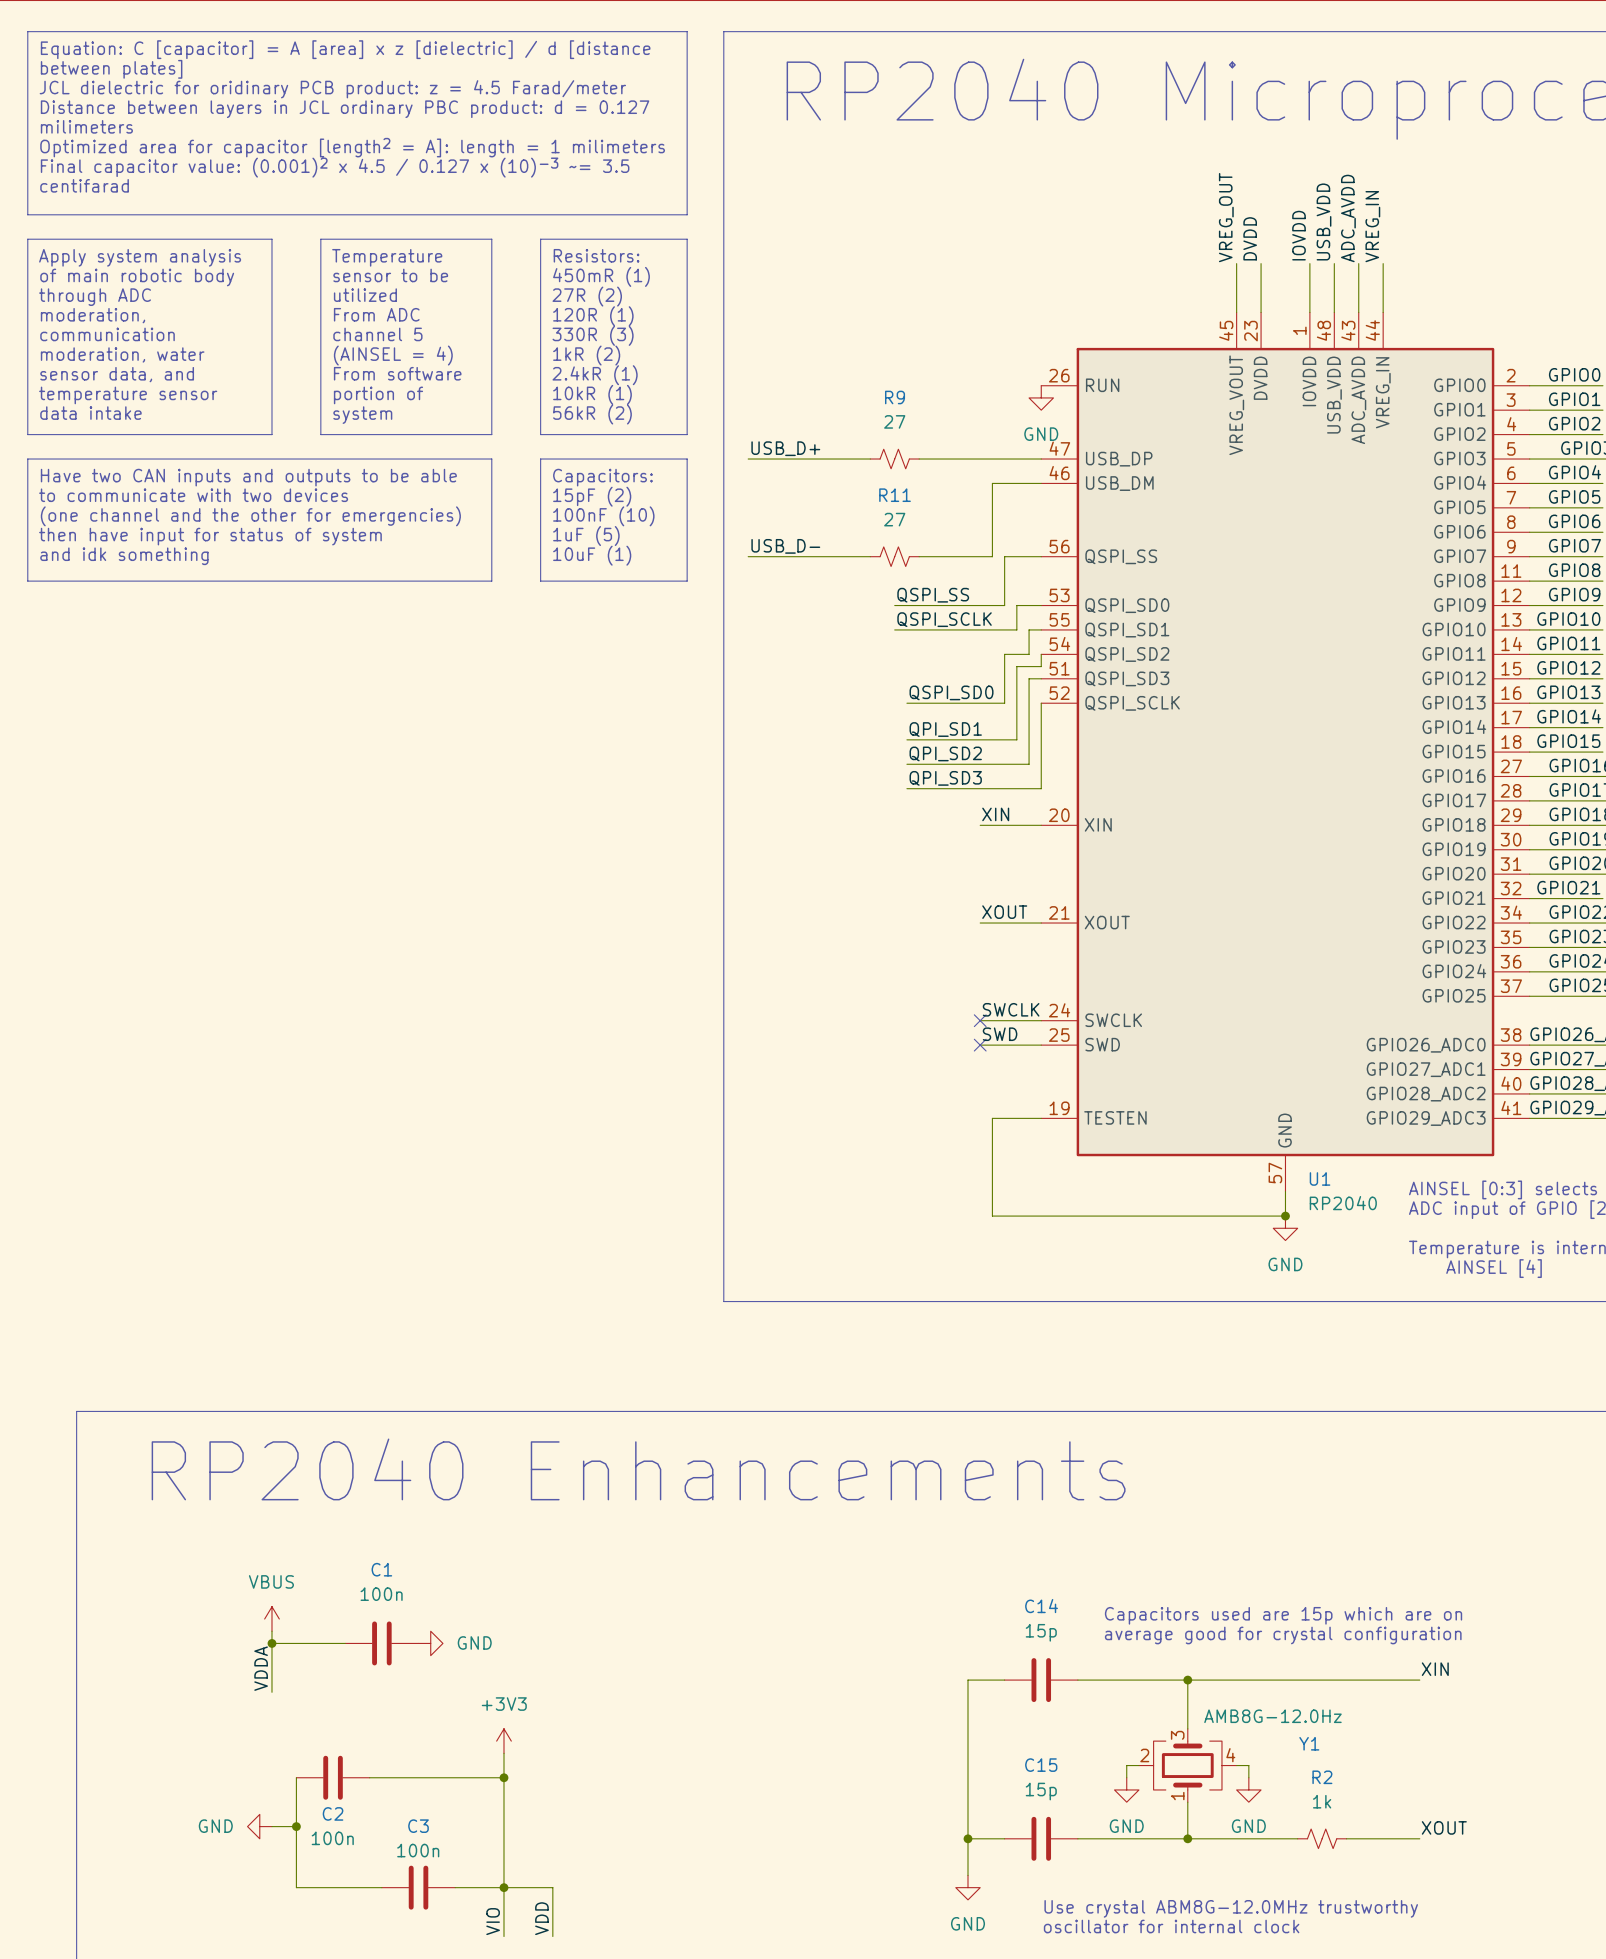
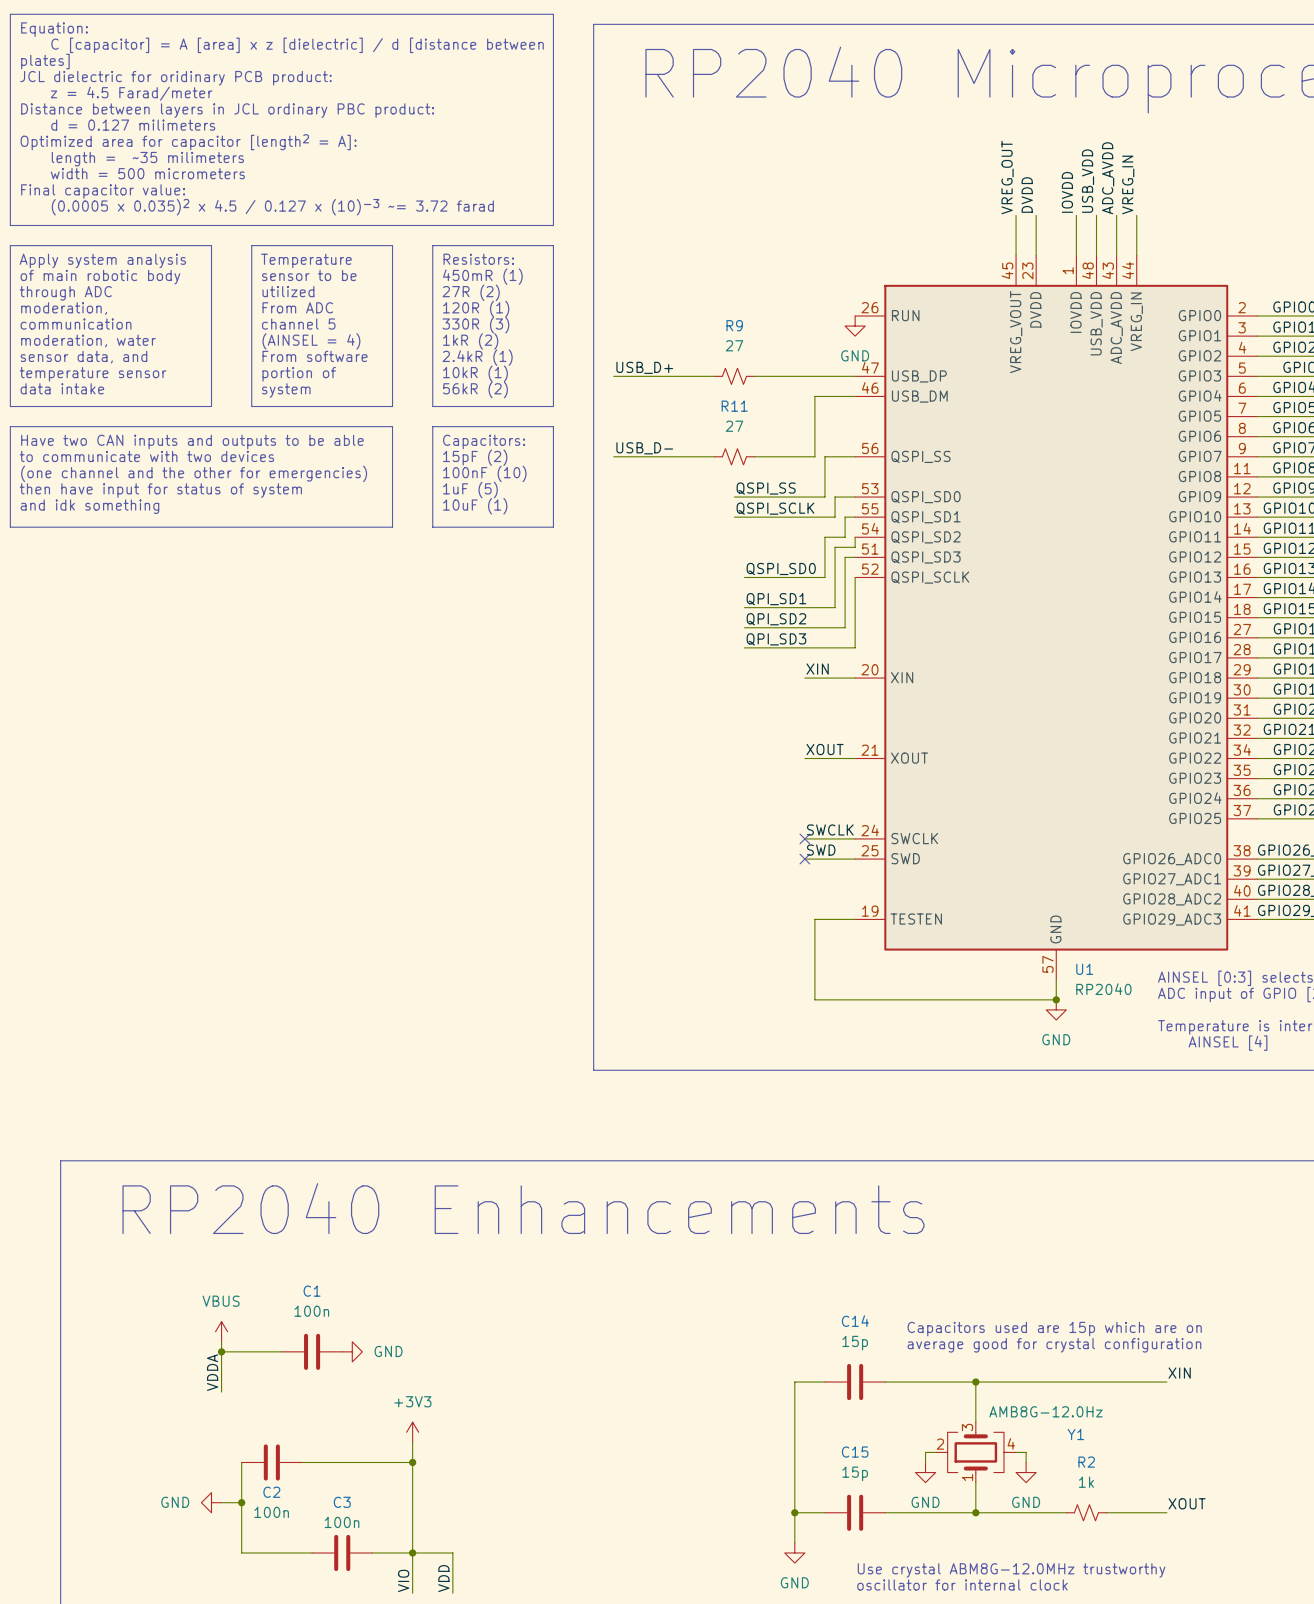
line: (27, 31) (687, 31) (687, 214) (27, 214) (27, 31) -> (10, 14) (10, 225) (553, 225) (553, 14) (10, 14)
text: none -> Equation: (54, 29)
text: Equation: C [capacitor] = A [area] x z [dielectric] / d [distance (345, 49) -> C [capacitor] = A [area] x z [dielectric] / d [distance between (297, 45)
text: between plates] (111, 69) -> plates] (45, 61)
text: JCL dielectric for oridinary PCB product: z = 4.5 Farad/meter (332, 89) -> JCL dielectric for oridinary PCB product: (175, 78)
text: Distance between layers in JCL ordinary PBC product: d = 0.127 (345, 109) -> none
text: none -> z = 4.5 Farad/meter (131, 93)
text: milimeters (86, 126) -> none
text: none -> Distance between layers in JCL ordinary PBC product: (227, 110)
text: Optimized area for capacitor [length2 = A]: length = 1 milimeters (352, 147) -> none
text: none -> d = 0.127 milimeters (133, 125)
text: Final capacitor value: (0.001)2 x 4.5 / 0.127 x (10)-3 ~= 3.5 (335, 167) -> none
text: none -> Optimized area for capacitor [length2 = A]: (188, 142)
text: centifarad (84, 185) -> none
text: none -> length = ~35 milimeters (147, 159)
text: none -> width = 500 micrometers (147, 173)
text: none -> Final capacitor value: (103, 191)
line: (27, 239) (27, 434) (271, 434) (271, 239) (27, 239) -> (10, 245) (10, 406) (211, 406) (211, 245) (10, 245)
line: (320, 239) (491, 239) (491, 434) (320, 434) (320, 239) -> (251, 245) (392, 245) (392, 406) (251, 406) (251, 245)
line: (540, 239) (540, 434) (687, 434) (687, 239) (540, 239) -> (432, 245) (432, 406) (553, 406) (553, 245) (432, 245)
text: none -> (0.0005 x 0.035)2 x 4.5 / 0.127 x (10)-3 ~= 3.72 farad (272, 207)
text position: Resistors: (596, 255) -> Resistors: (478, 259)
text position: Apply system analysis (140, 257) -> Apply system analysis (102, 260)
text position: Temperature (387, 257) -> Temperature (306, 260)
text position: sensor to be (390, 275) -> sensor to be (309, 275)
text position: 450mR (1) (601, 276) -> 450mR (1) (482, 276)
text position: of main robotic body (137, 277) -> of main robotic body (100, 277)
text position: utilized (365, 295) -> utilized (288, 291)
text position: 27R (2) (587, 296) -> 27R (2) (471, 292)
text position: through ADC (95, 297) -> through ADC (65, 293)
text position: From ADC (376, 314) -> From ADC (297, 307)
text position: moderation, (93, 315) -> moderation, (64, 308)
text position: 120R (1) (593, 316) -> 120R (1) (476, 309)
text position: communication (107, 334) -> communication (76, 324)
text position: channel 5 (377, 334) -> channel 5 (298, 324)
text position: 330R (3) (593, 335) -> 330R (3) (475, 325)
text position: moderation, water (122, 354) -> moderation, water (88, 340)
text position: (AINSEL = 4) (393, 355) -> (AINSEL = 4) (311, 341)
text position: 1kR (2) (586, 355) -> 1kR (2) (470, 341)
text position: From software (397, 373) -> From software (315, 356)
text position: sensor data, and (117, 374) -> sensor data, and (83, 357)
text position: 2.4kR (1) (595, 375) -> 2.4kR (1) (477, 357)
text position: 10kR (1) (592, 394) -> 10kR (1) (475, 373)
text position: temperature sensor (128, 395) -> temperature sensor (93, 374)
text position: portion of (378, 395) -> portion of (299, 374)
text position: data intake (90, 413) -> data intake (62, 388)
text position: 56kR (2) (592, 414) -> 56kR (2) (475, 389)
text position: system (362, 415) -> system (286, 390)
line: (27, 459) (491, 459) (491, 581) (27, 581) (27, 459) -> (10, 426) (392, 426) (392, 527) (10, 527) (10, 426)
line: (540, 459) (687, 459) (687, 581) (540, 581) (540, 459) -> (432, 426) (553, 426) (553, 527) (432, 527) (432, 426)
text position: Have two CAN inputs and outputs to be able (248, 477) -> Have two CAN inputs and outputs to be able (192, 441)
text position: Capacitors: (602, 477) -> Capacitors: (484, 441)
text position: to communicate with two devices (193, 495) -> to communicate with two devices (146, 456)
text position: 15pF (2) (592, 496) -> 15pF (2) (475, 457)
text position: (one channel and the other for emergencies) (250, 516) -> (one channel and the other for emergencies) (194, 473)
text position: 100nF (10) (603, 516) -> 100nF (10) (484, 473)
text position: then have input for status of system (210, 536) -> then have input for status of system (160, 490)
text position: 1uF (5) (586, 536) -> 1uF (5) (470, 490)
text position: 10uF (1) (592, 555) -> 10uF (1) (475, 506)
text position: and idk something (124, 556) -> and idk something (89, 506)

